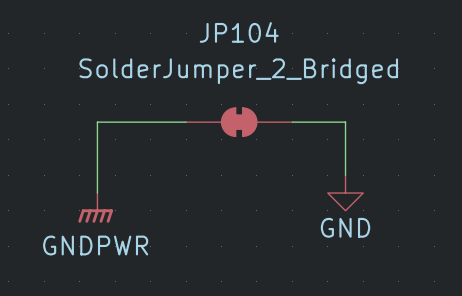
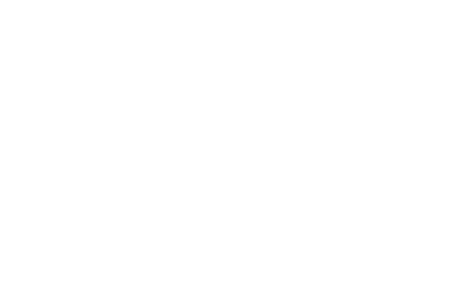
wire: (186, 122) (97, 122) (97, 193) -> none
JP104: SolderJumper_2_Bridged (239, 122) -> none
wire: (292, 122) (345, 122) (345, 175) -> none
power symbol: GND (345, 193) -> none
power symbol: GNDPWR (95, 207) -> none

